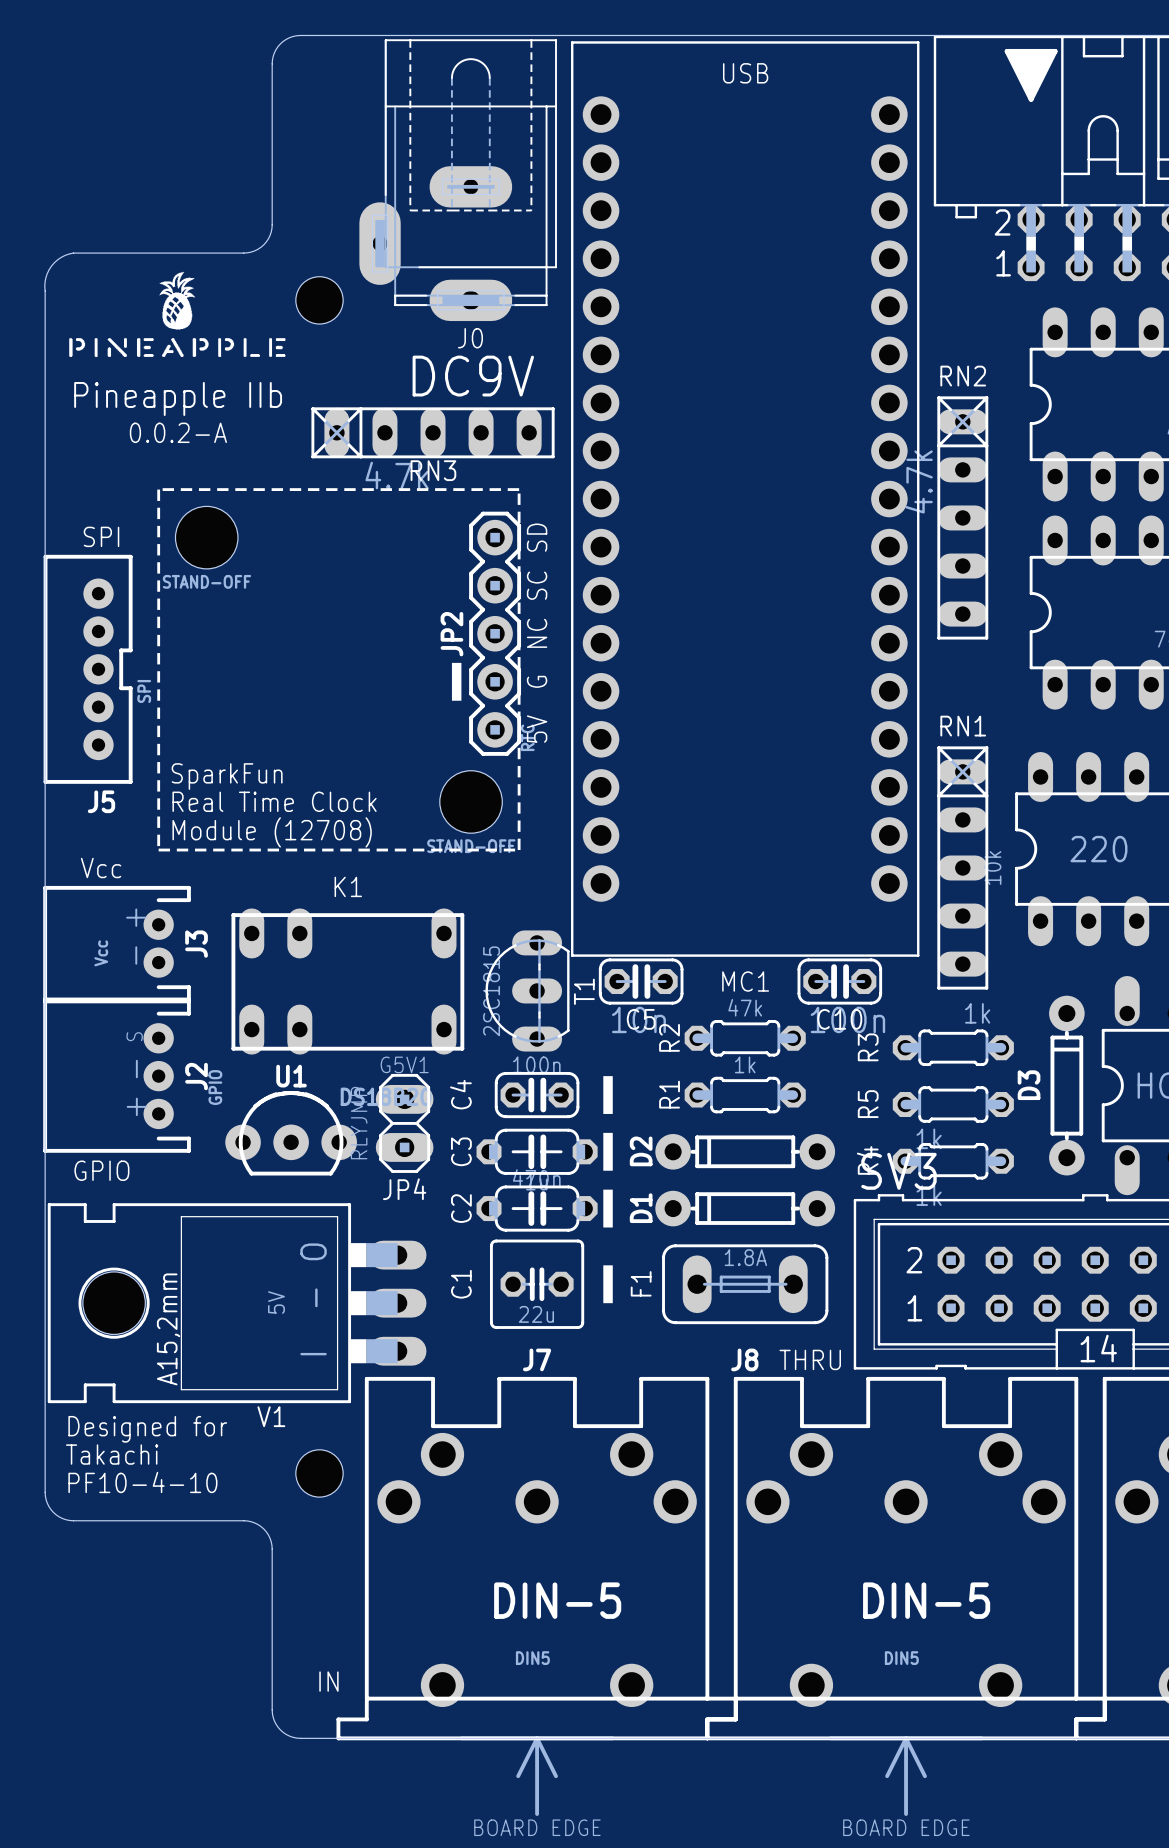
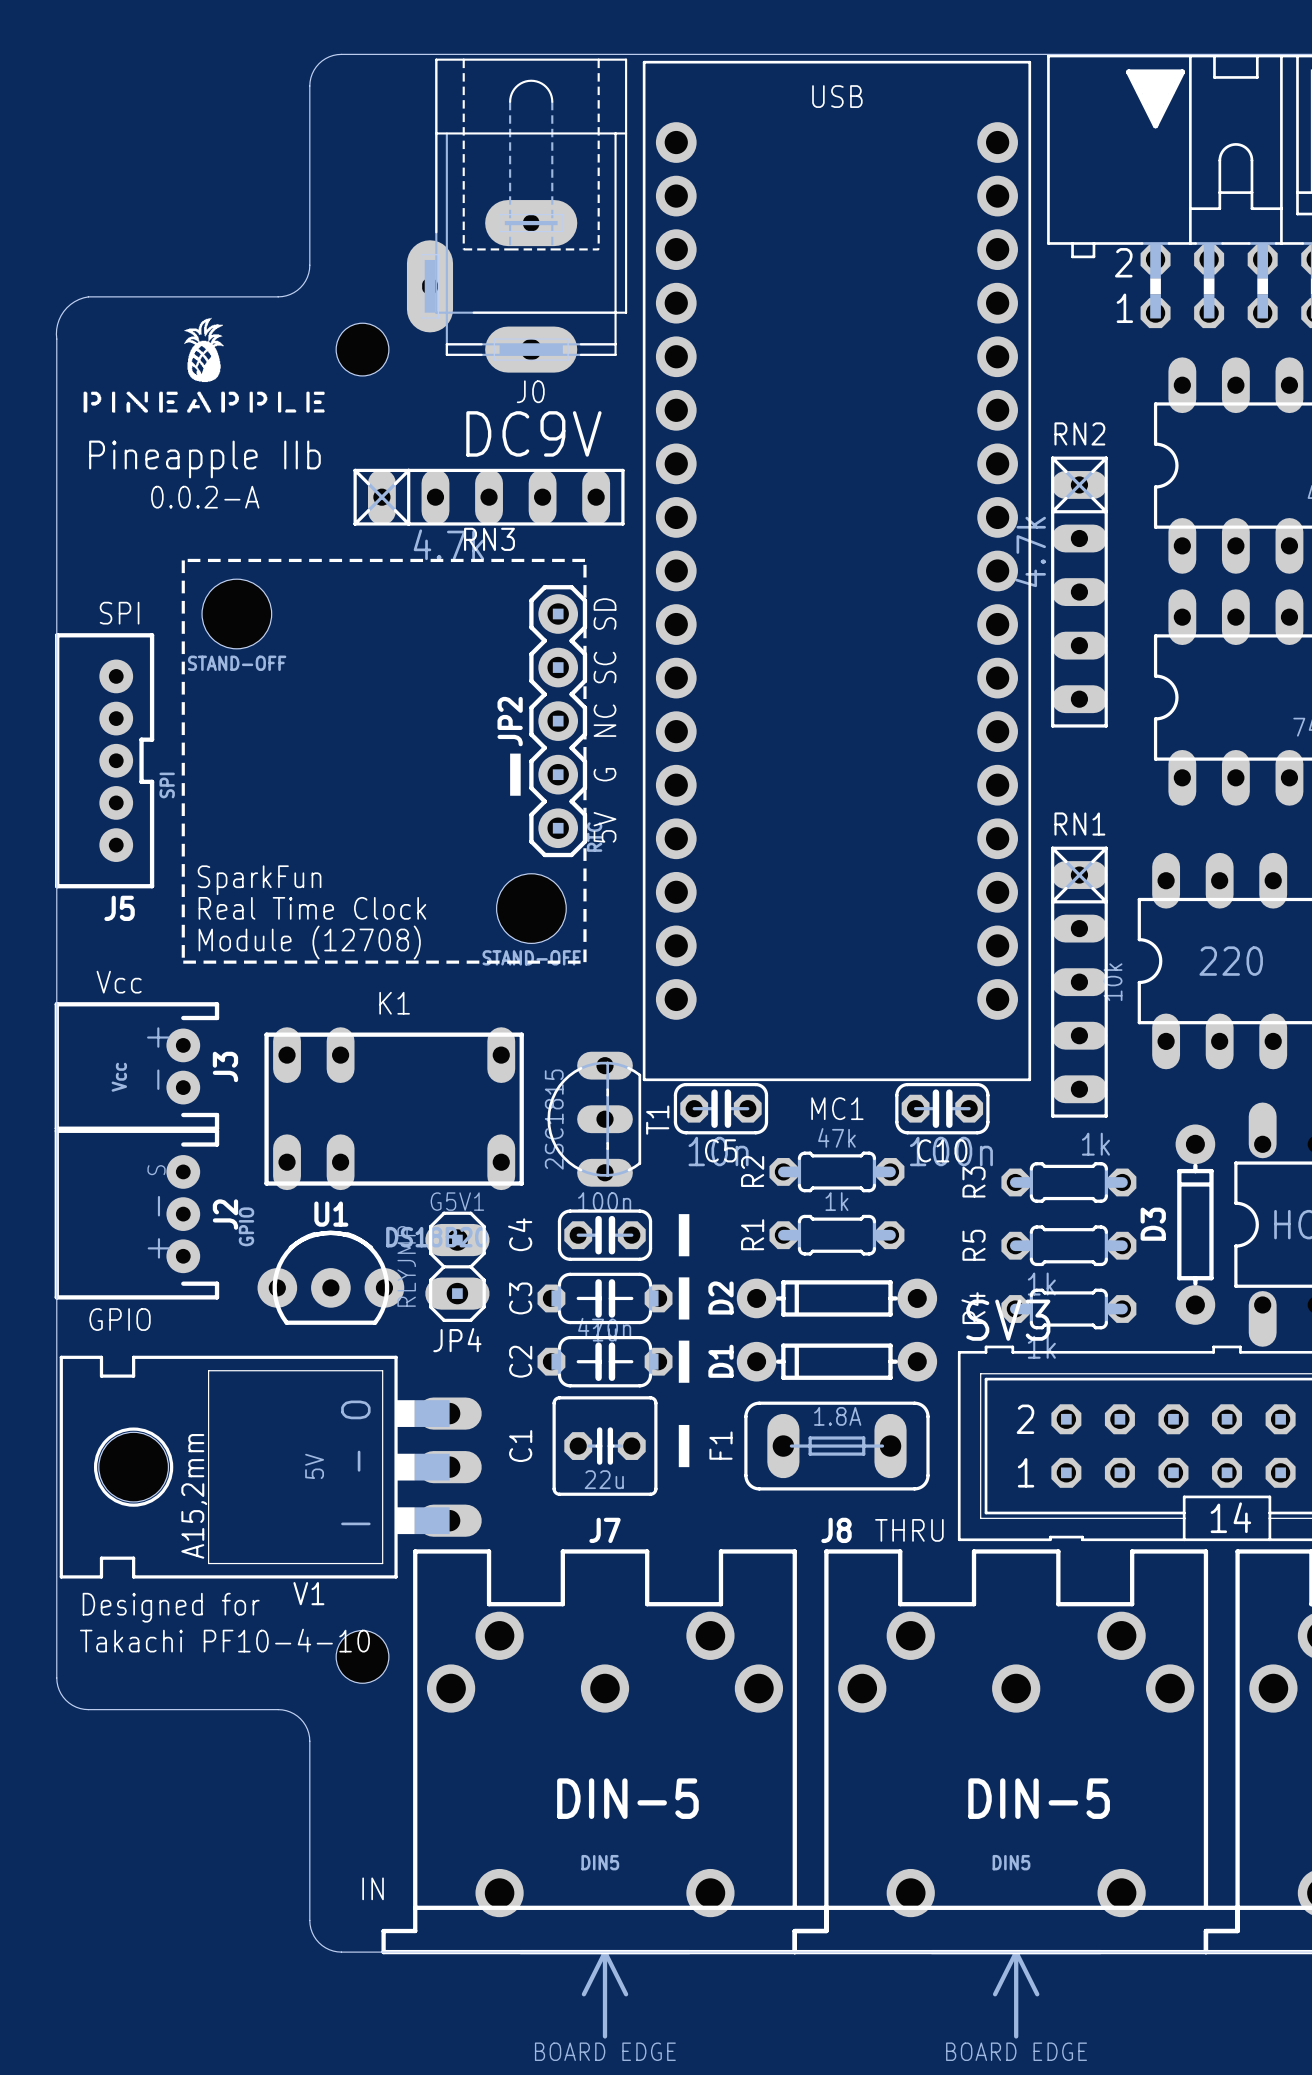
text: Takachi (112, 1454) -> Takachi PF10-4-10 (224, 1640)
text: PF10-4-10 (142, 1482) -> none

